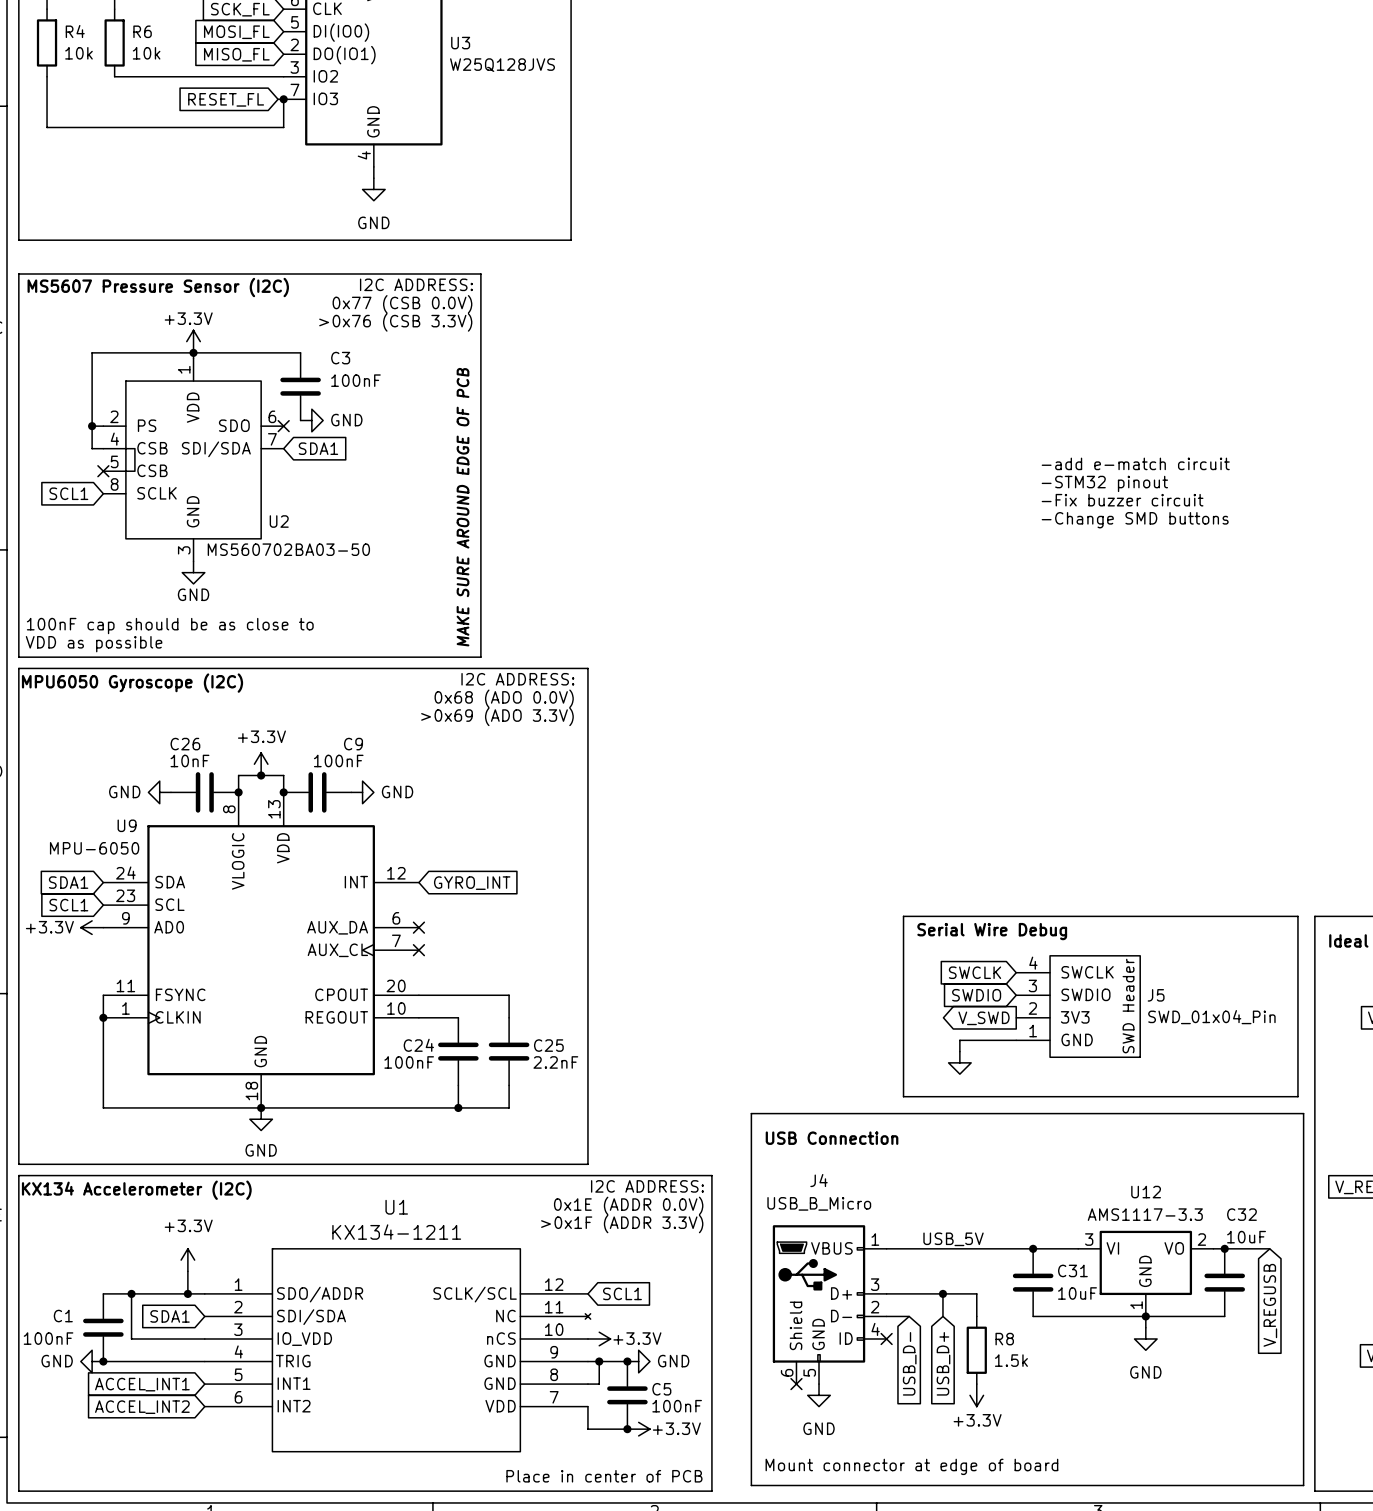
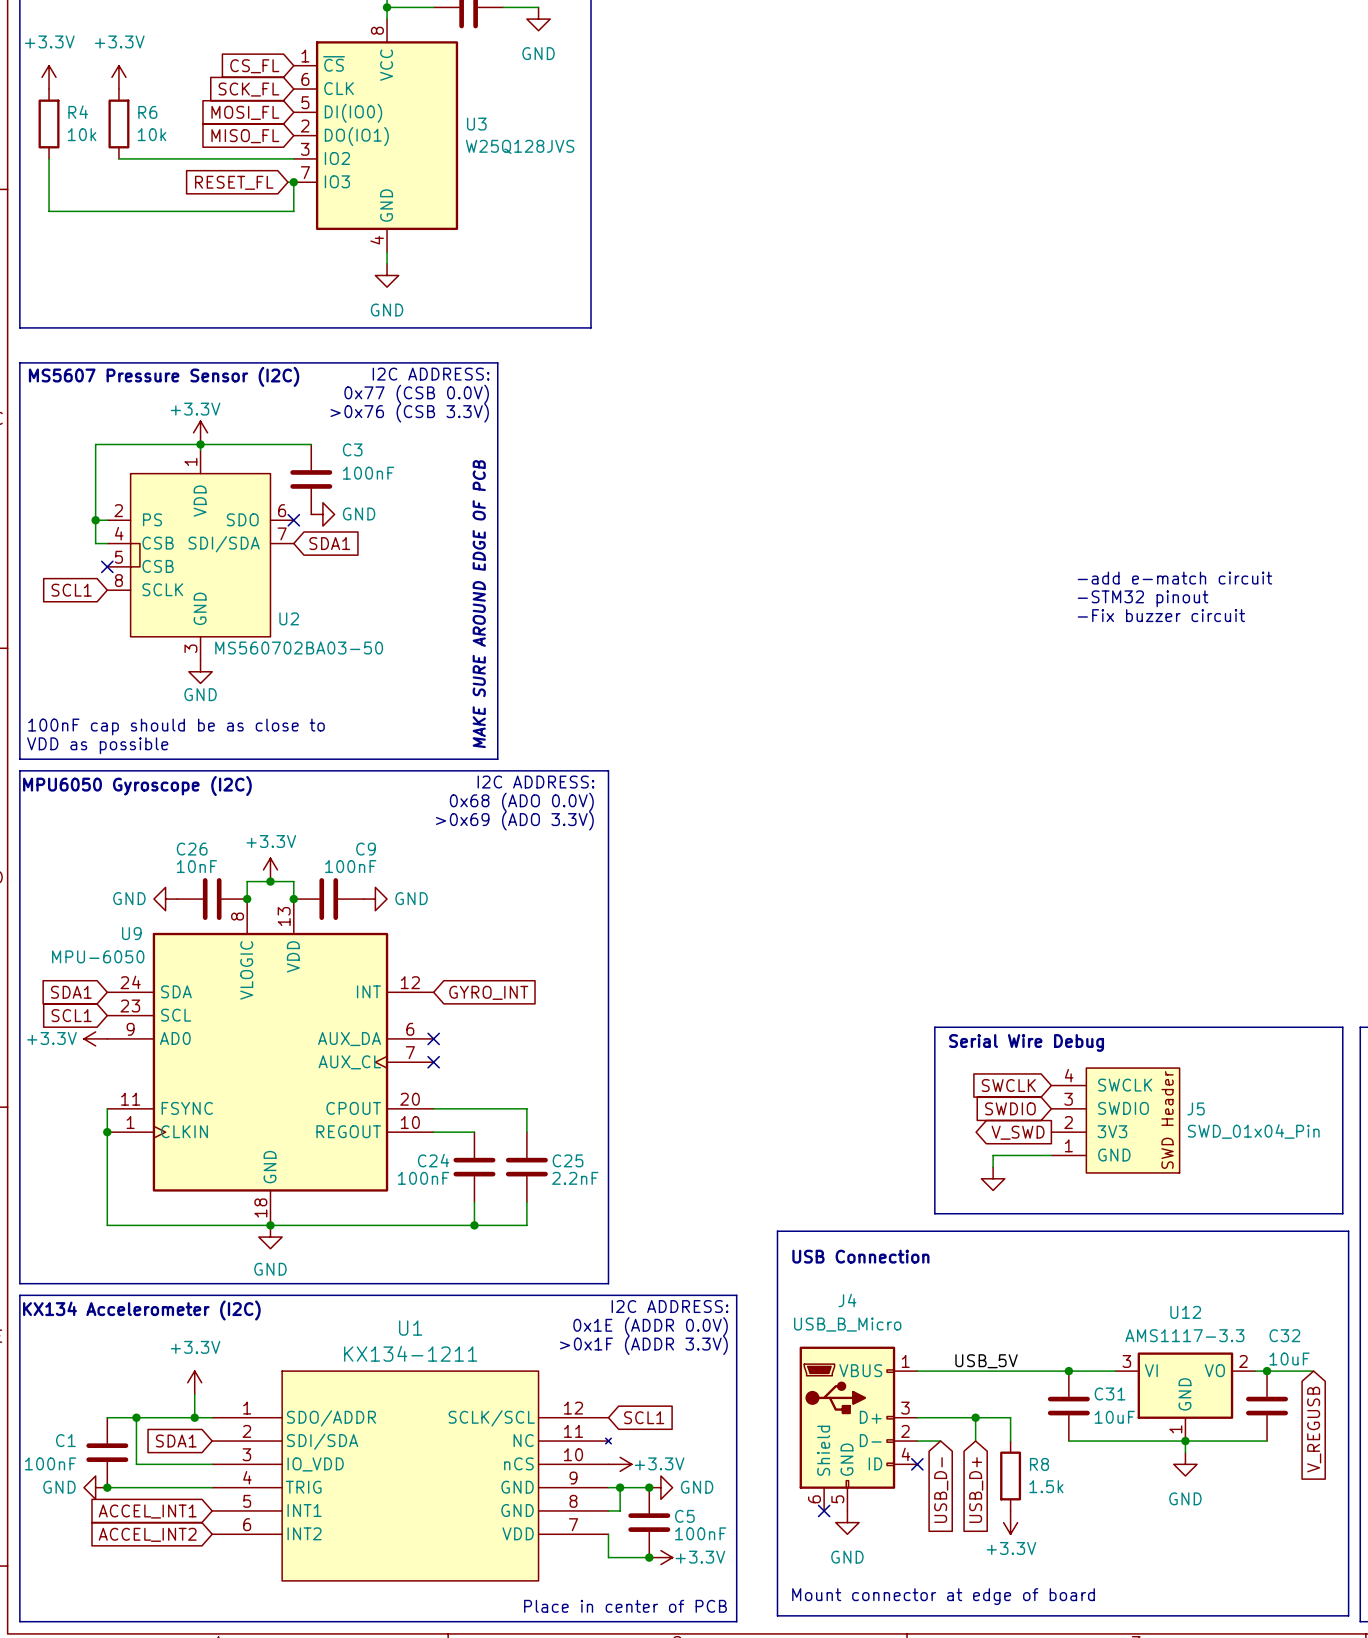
text: -add e-match circuit (1135, 463) -> none
text: -STM32 pinout (1104, 483) -> -add e-match circuit (1174, 578)
text: -Fix buzzer circuit (1122, 500) -> -STM32 pinout (1143, 598)
text: -Change SMD buttons (1135, 520) -> -Fix buzzer circuit (1161, 615)

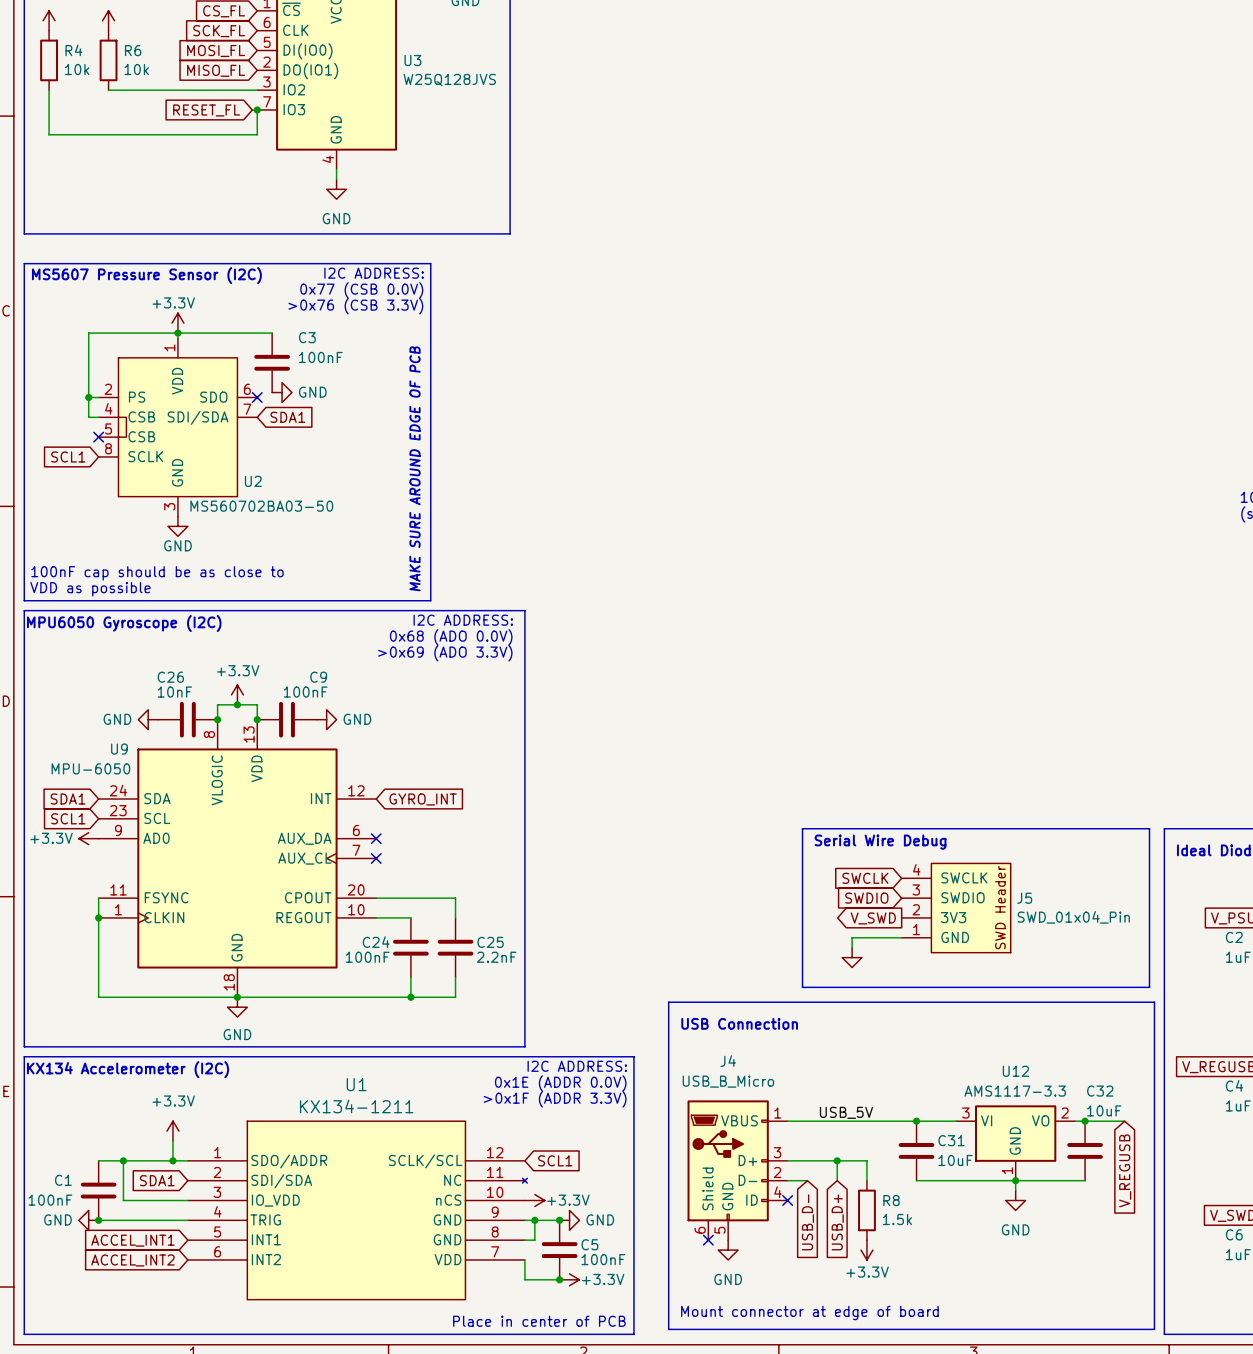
text: -add e-match circuit (1174, 578) -> none
text: -STM32 pinout (1143, 598) -> none
text: -Fix buzzer circuit (1161, 615) -> none

